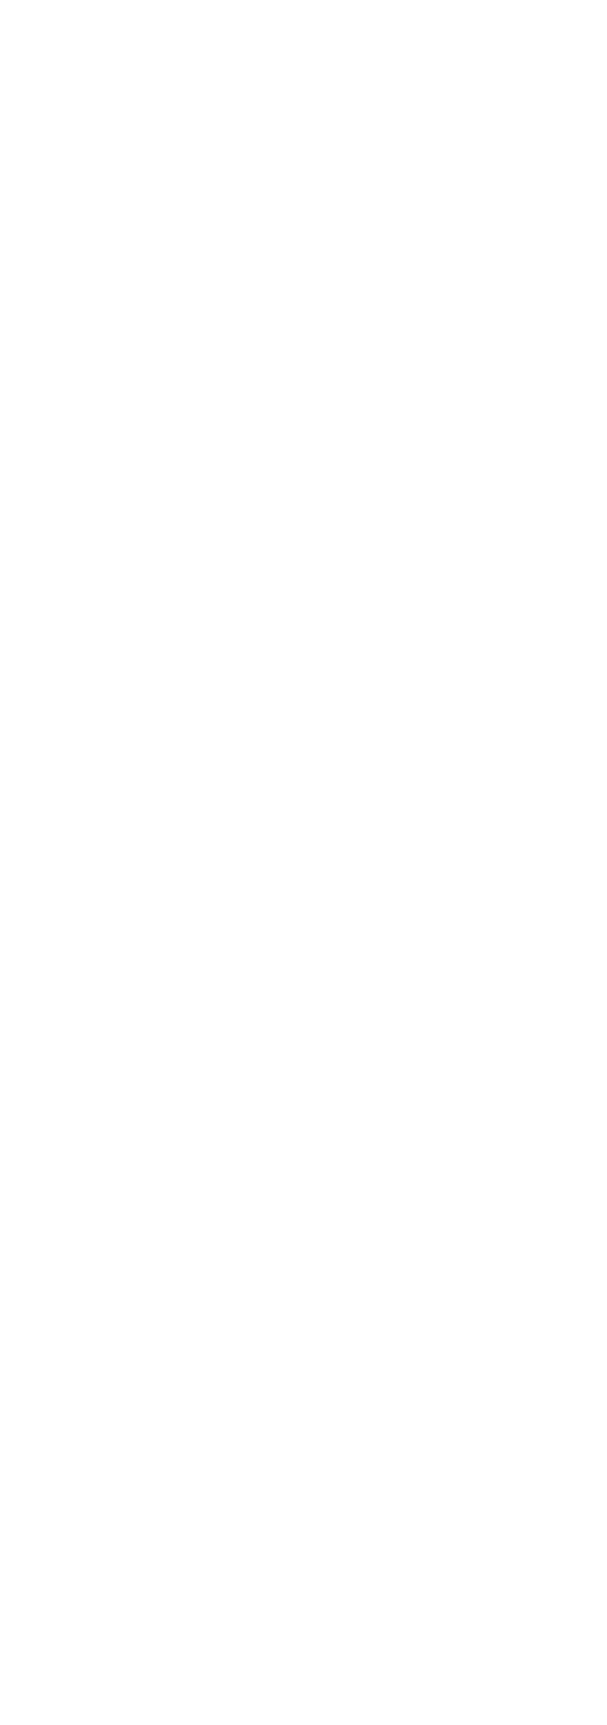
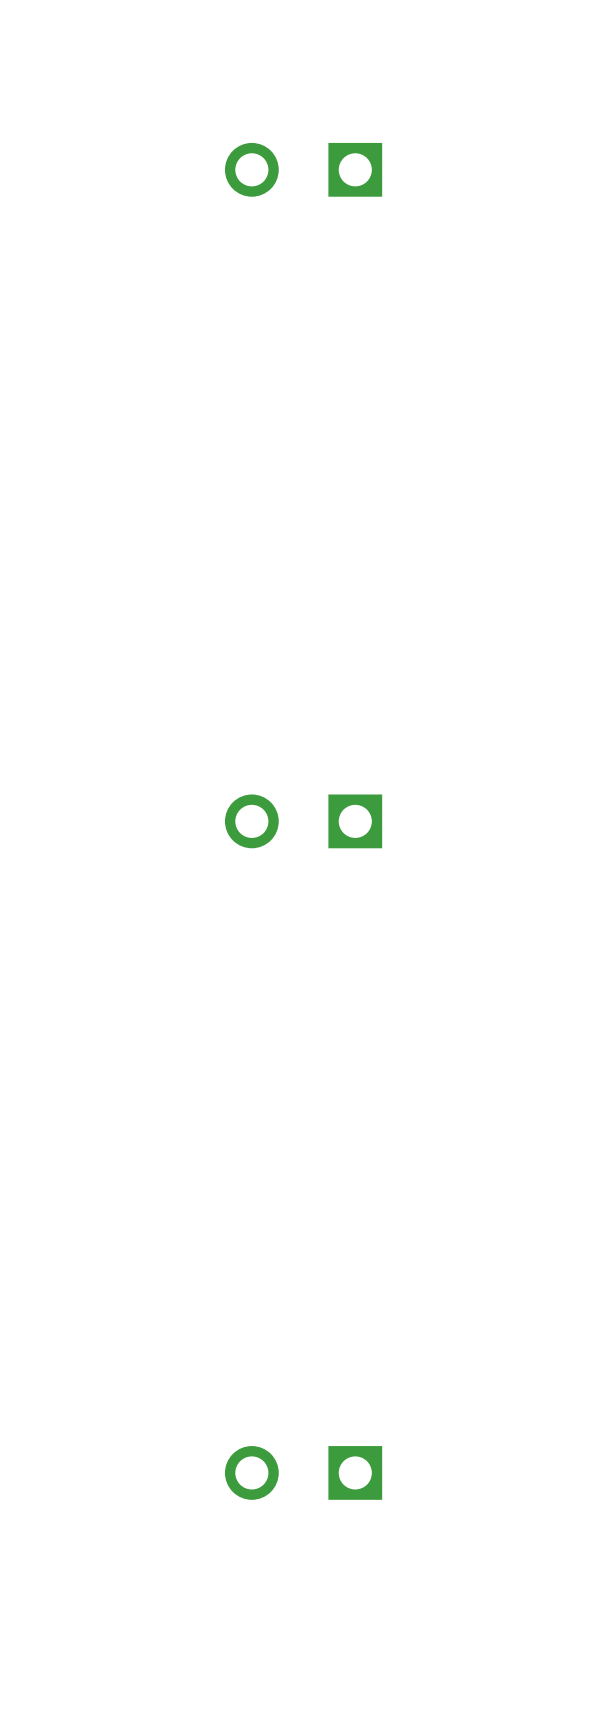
part: none -> (303, 169)
part: none -> (303, 821)
part: none -> (303, 1472)

